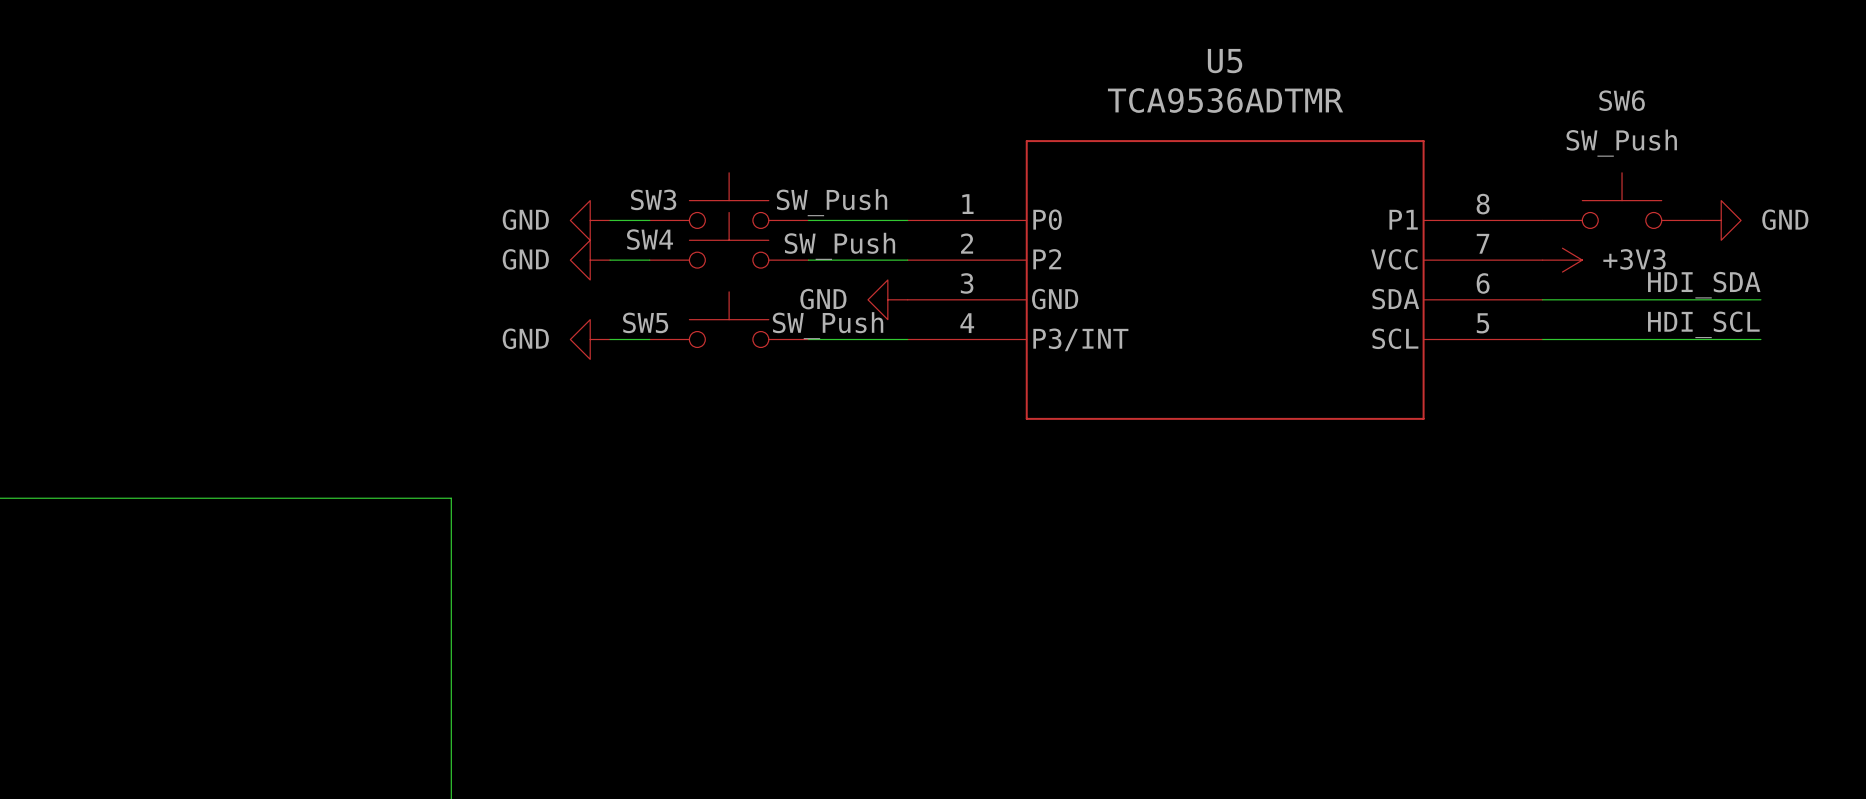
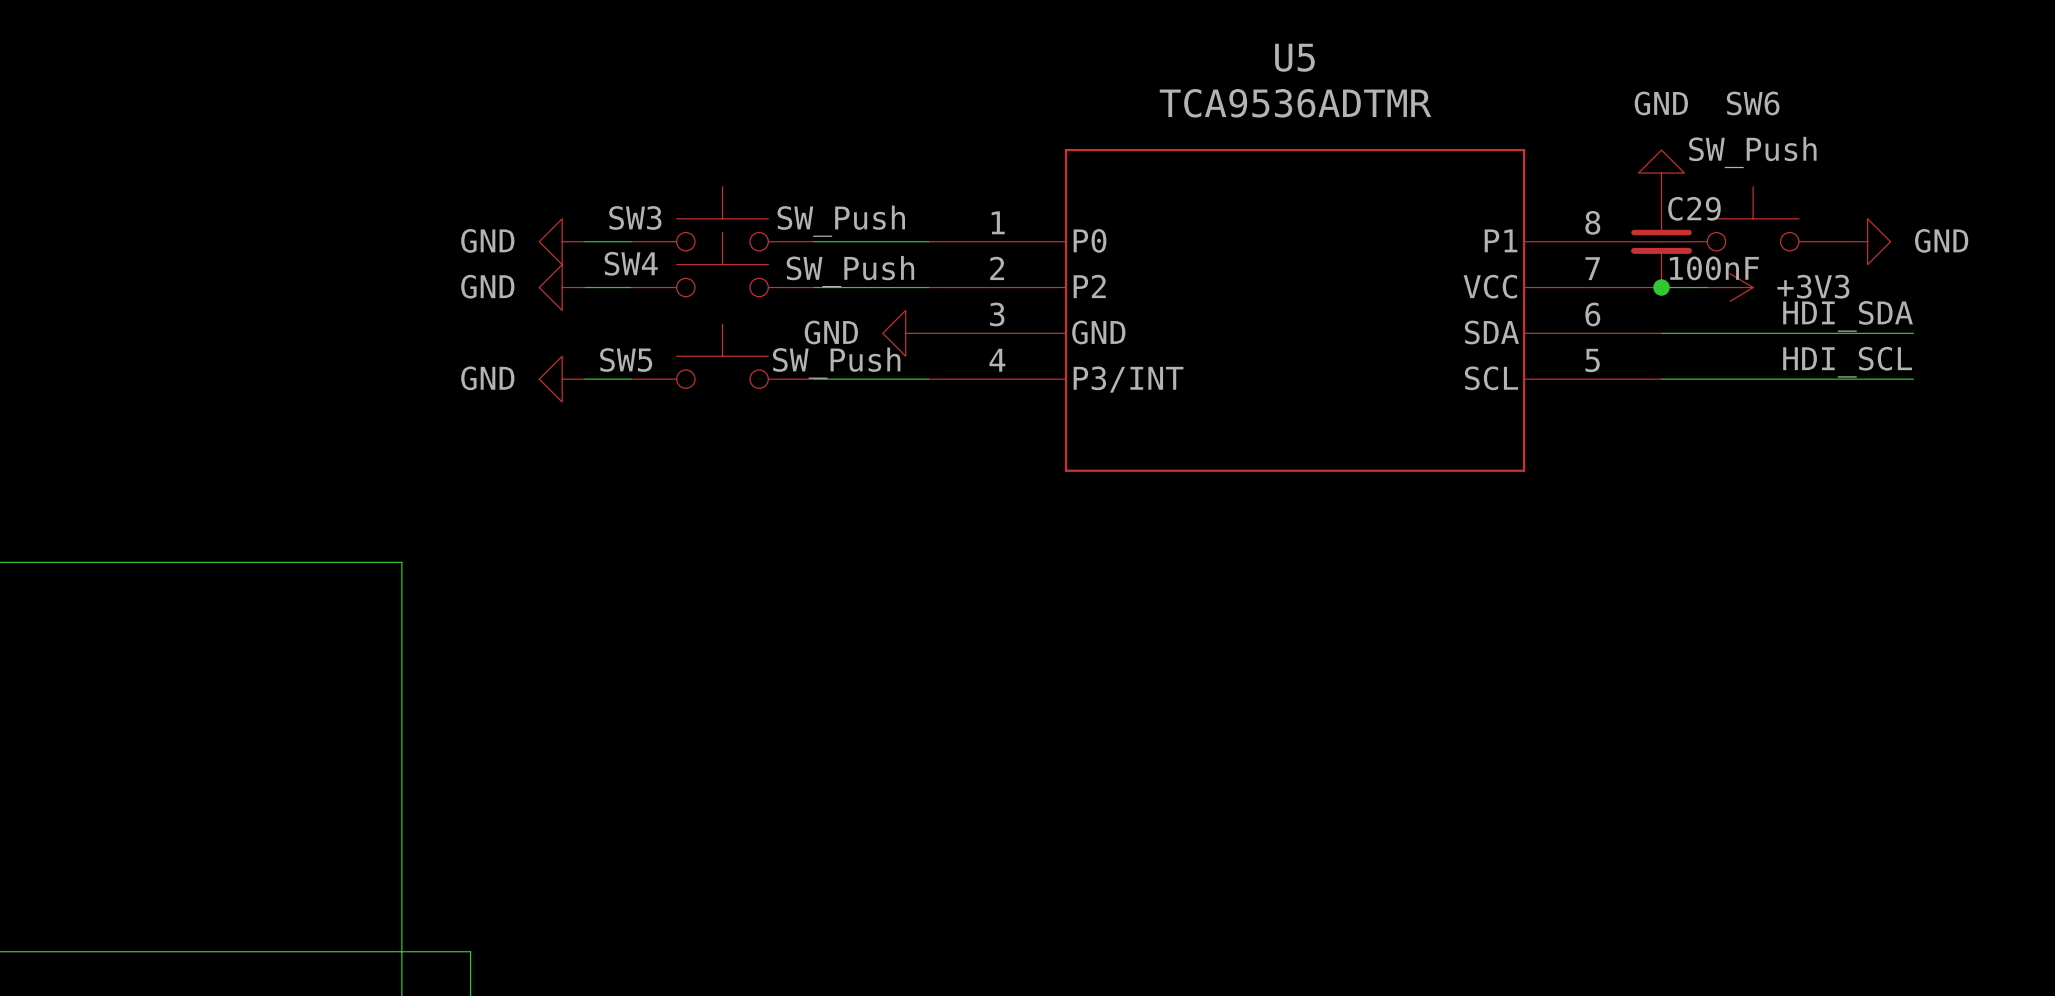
power symbol: none -> GND (1661, 173)
C29: none -> 100nF (1661, 241)
junction: none -> (1661, 287)
power symbol position: +3V3 (1562, 260) -> +3V3 (1730, 287)

